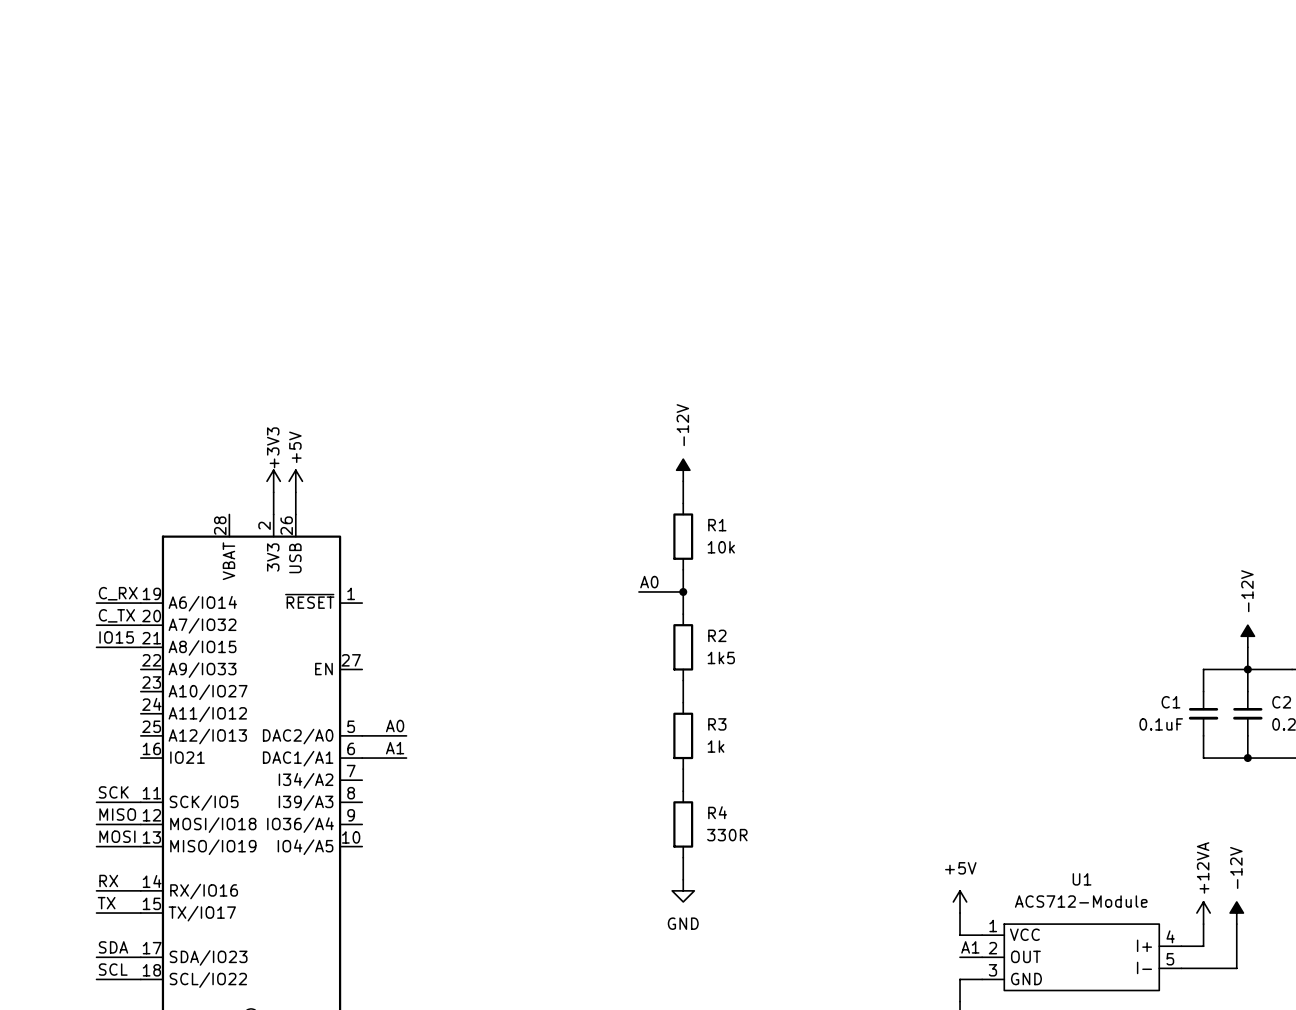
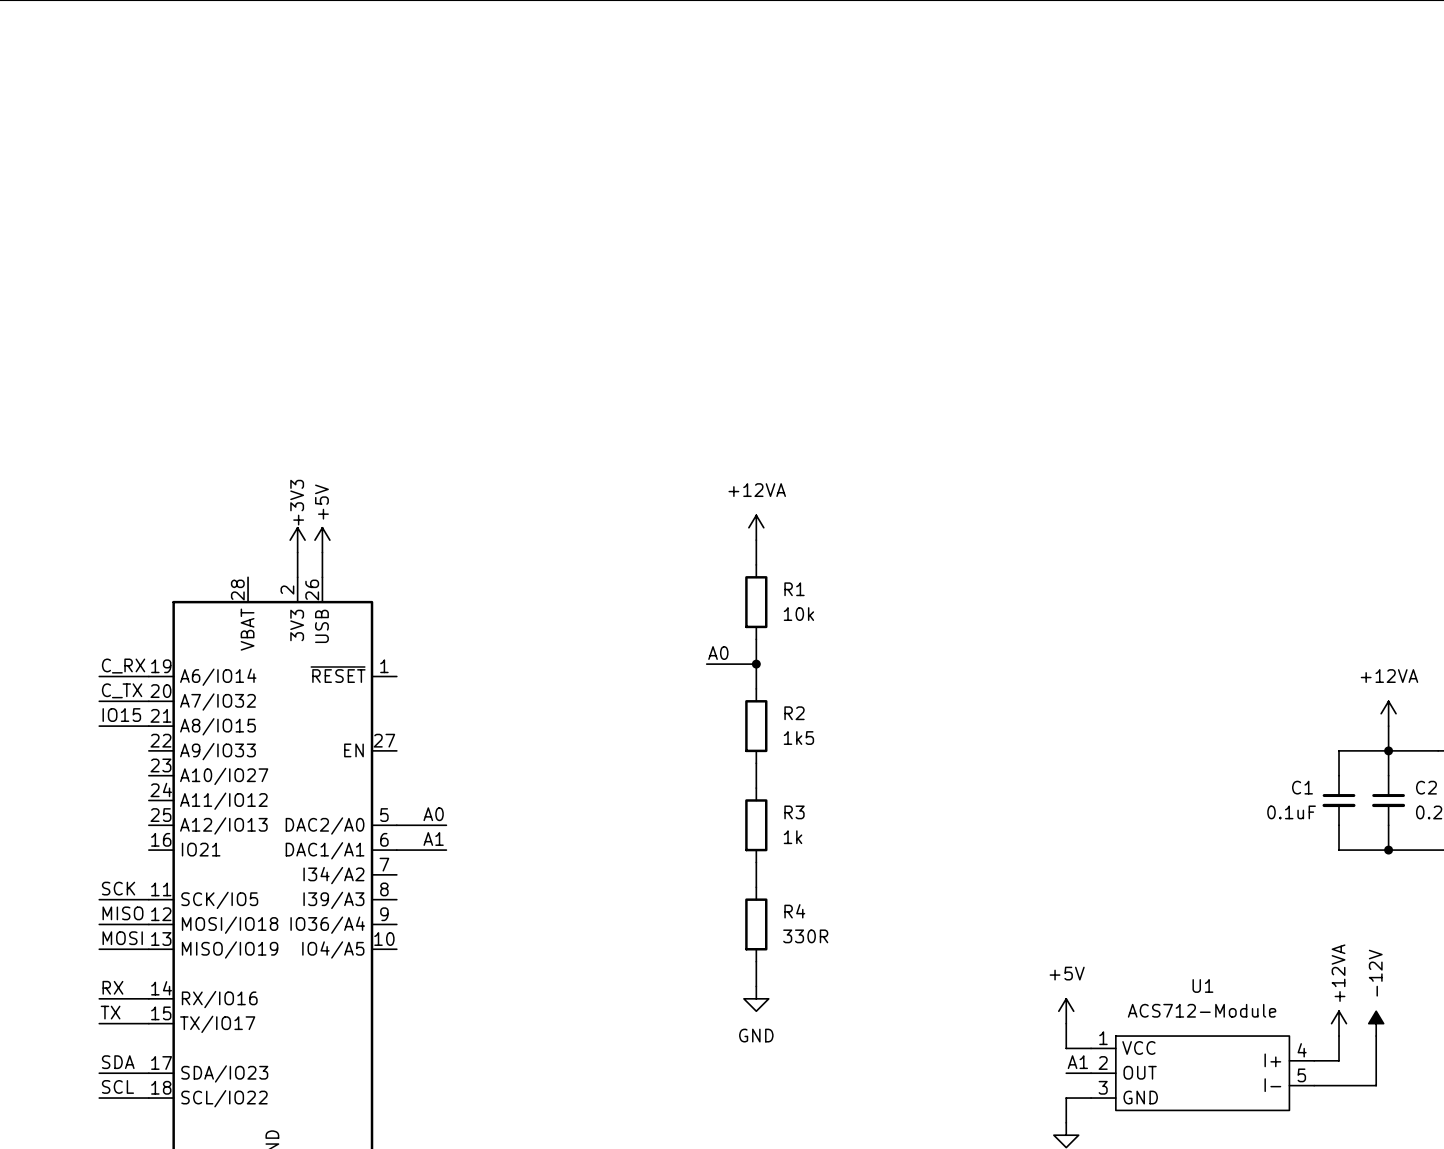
power symbol: -12V (683, 470) -> +12VA (756, 527)
power symbol: -12V (1247, 636) -> +12VA (1388, 713)

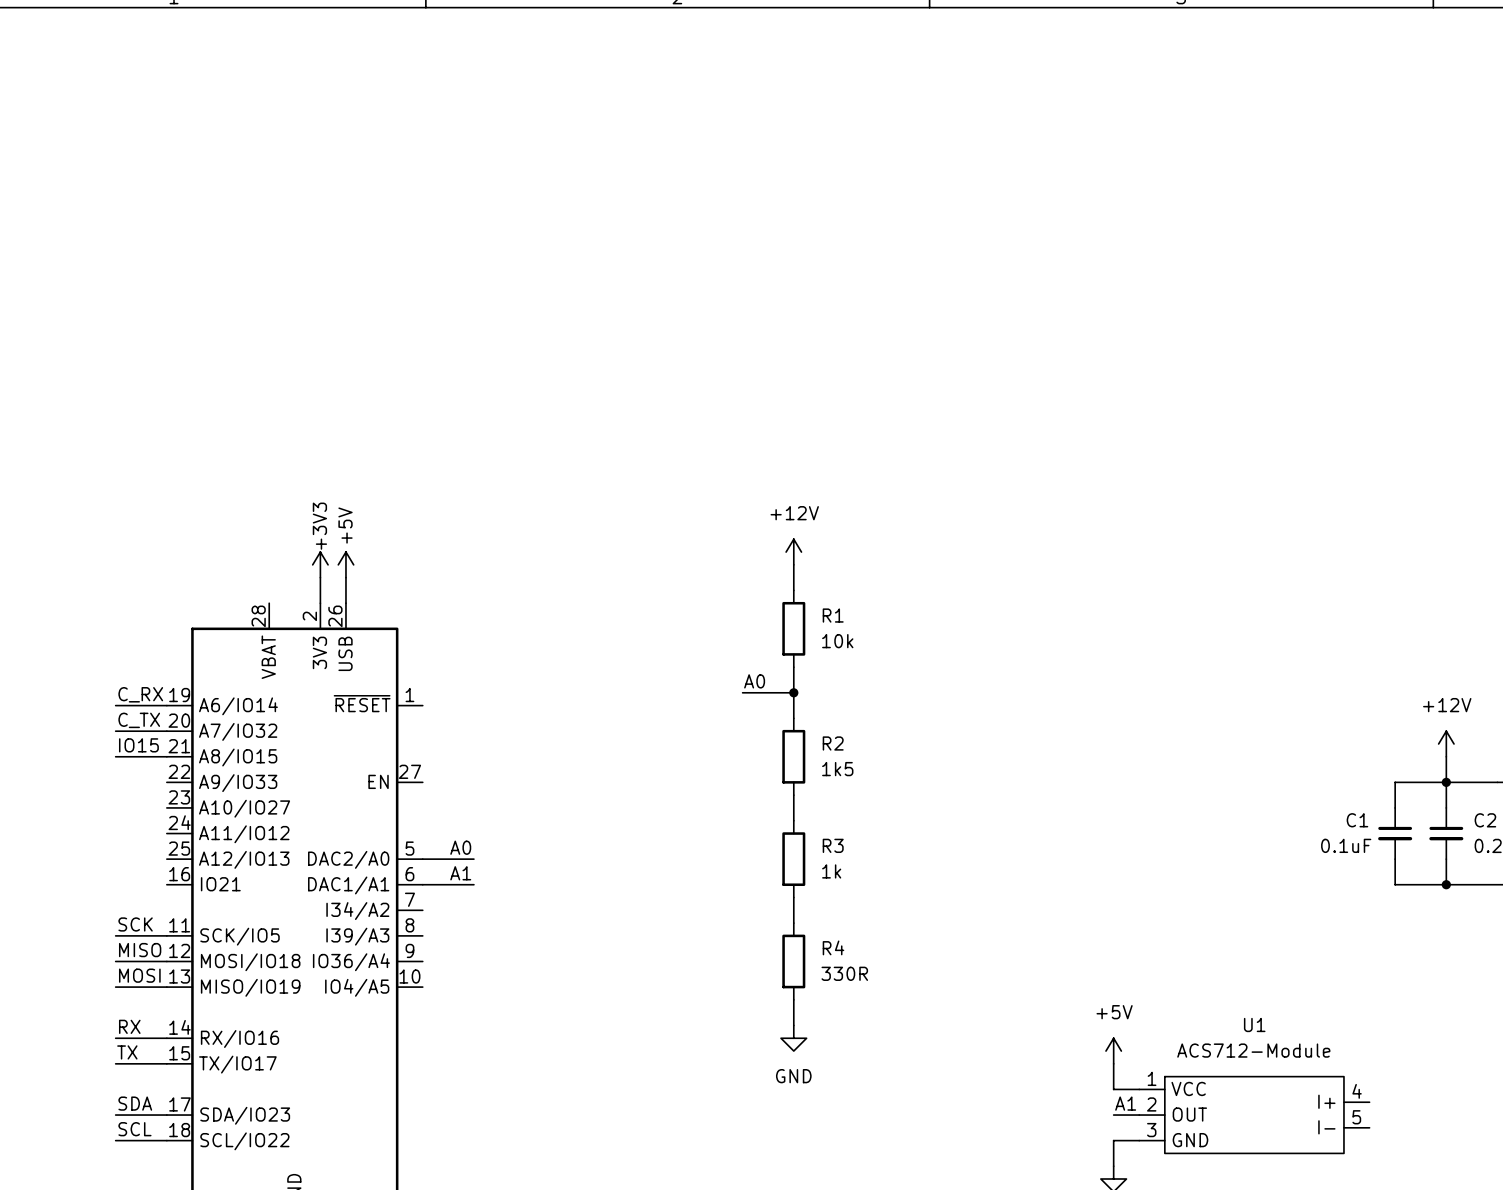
power symbol: +12VA (756, 527) -> +12V (793, 552)
power symbol: +12VA (1388, 713) -> +12V (1446, 743)
power symbol: +12VA (1339, 1023) -> none
power symbol: -12V (1376, 1023) -> none
wire: (1339, 1036) (1339, 1060) (1314, 1060) -> none
wire: (1376, 1036) (1376, 1085) (1314, 1085) -> none

